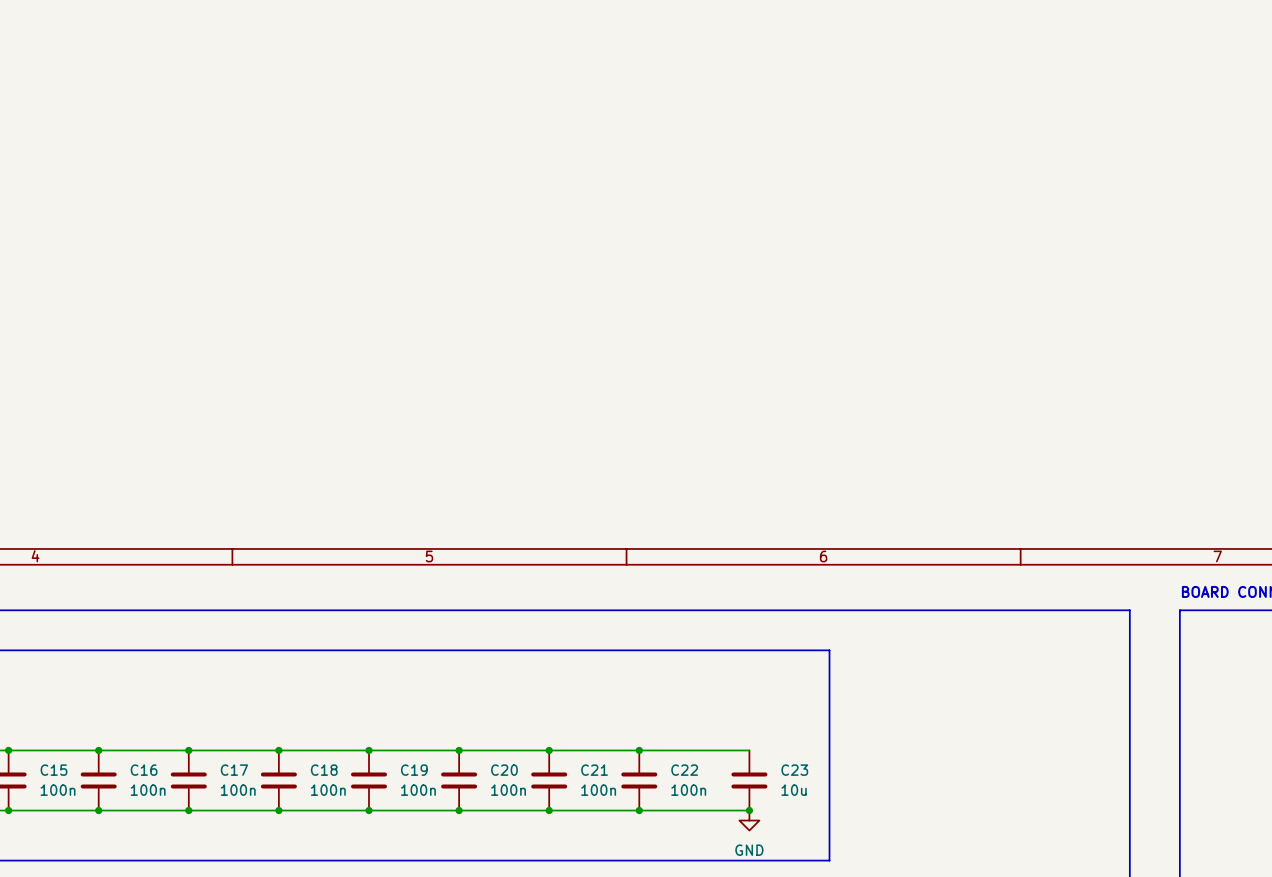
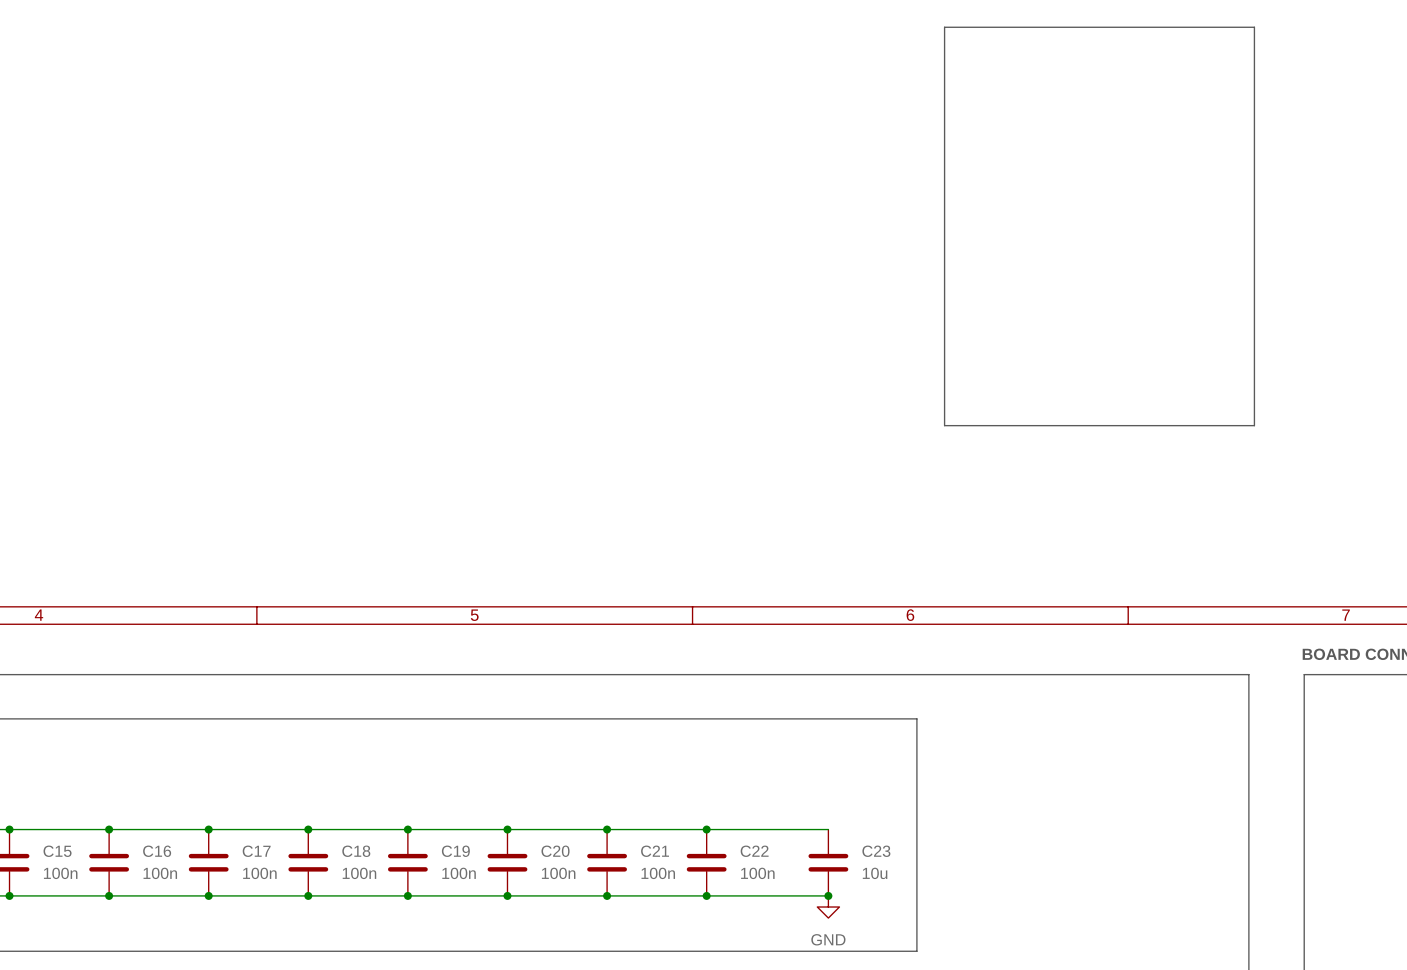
line: none -> (944, 27) (1254, 27) (1254, 425) (944, 425) (944, 27)

